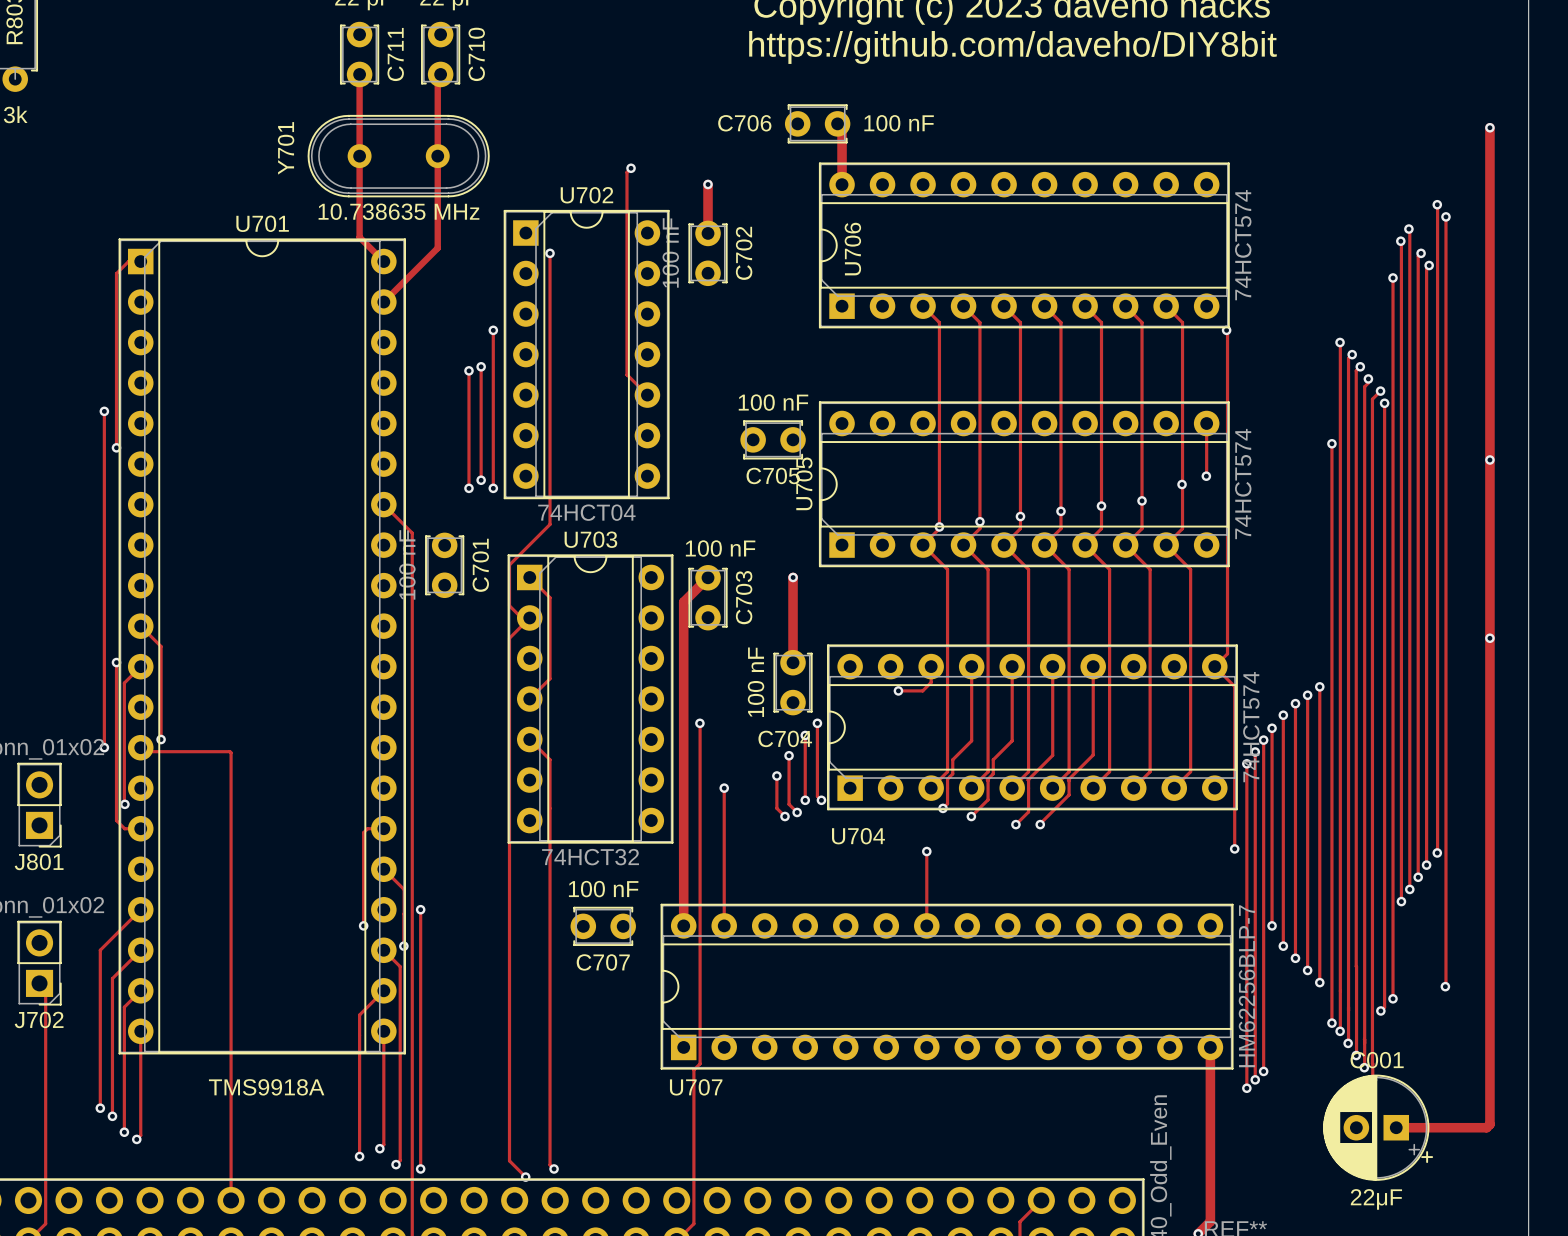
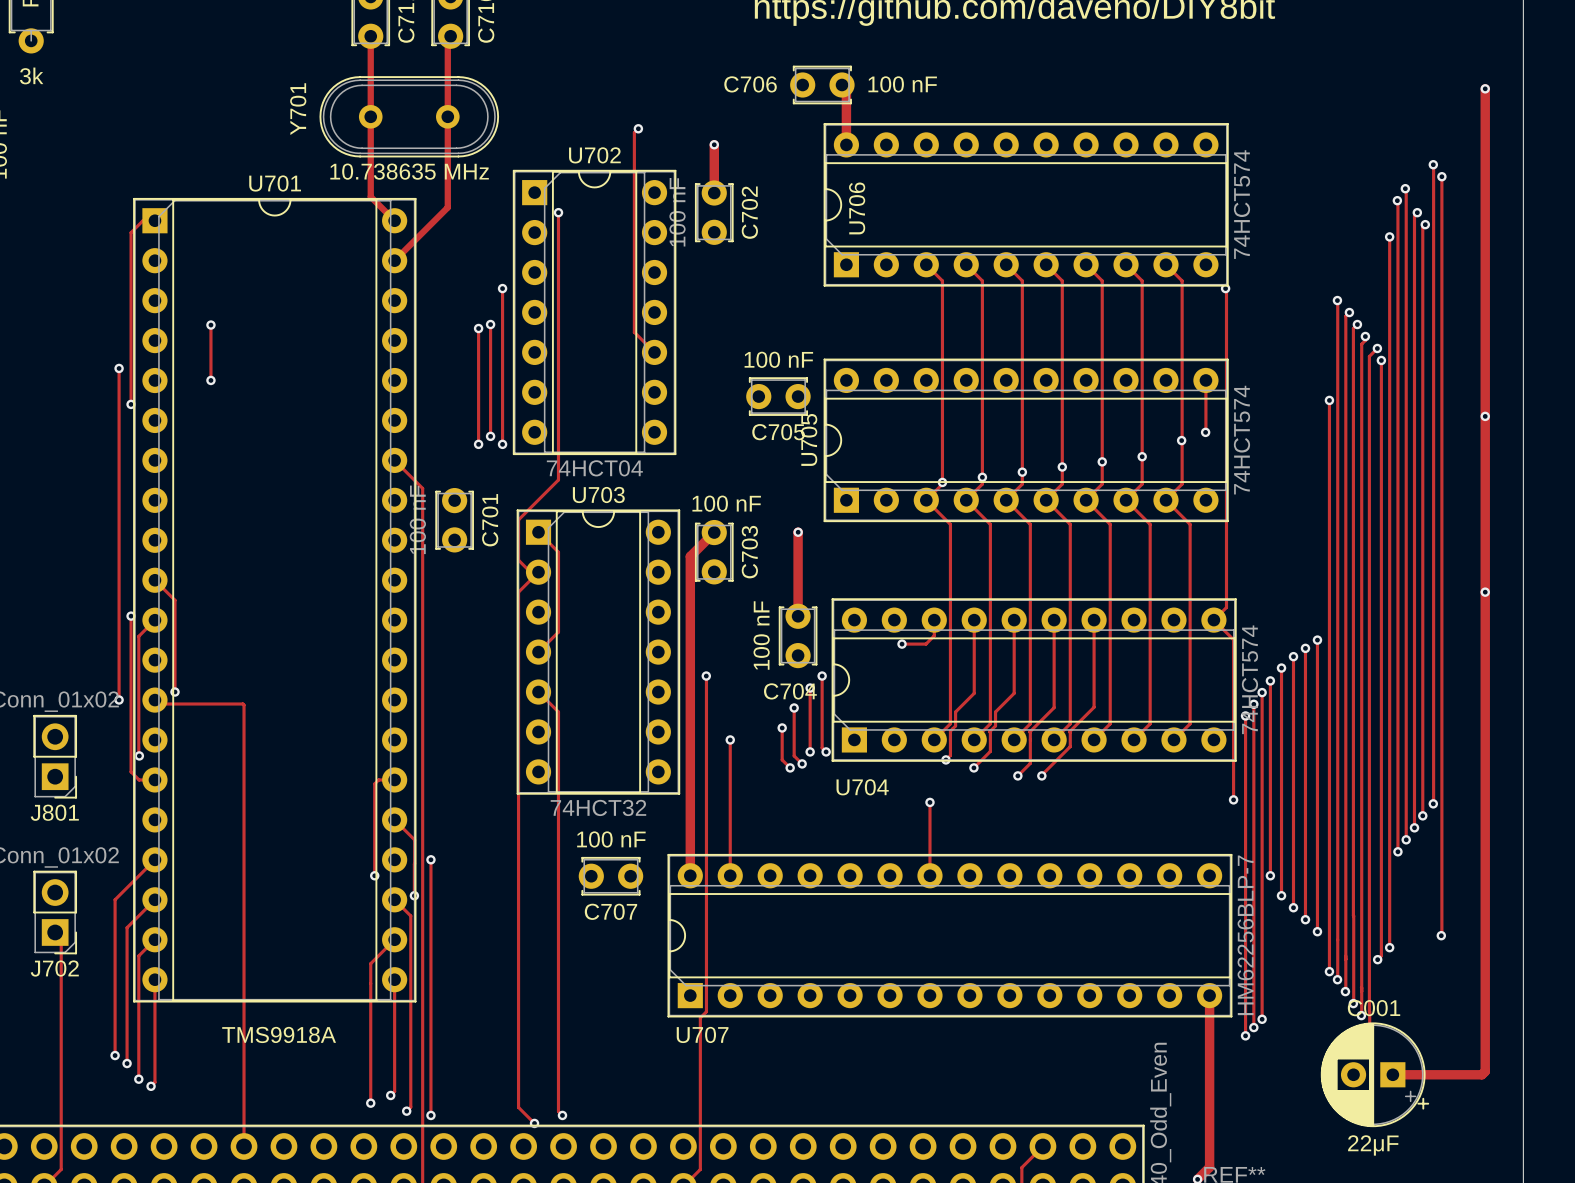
track: none -> (210, 325) (210, 380)
via: none -> (210, 325)
via: none -> (210, 380)

